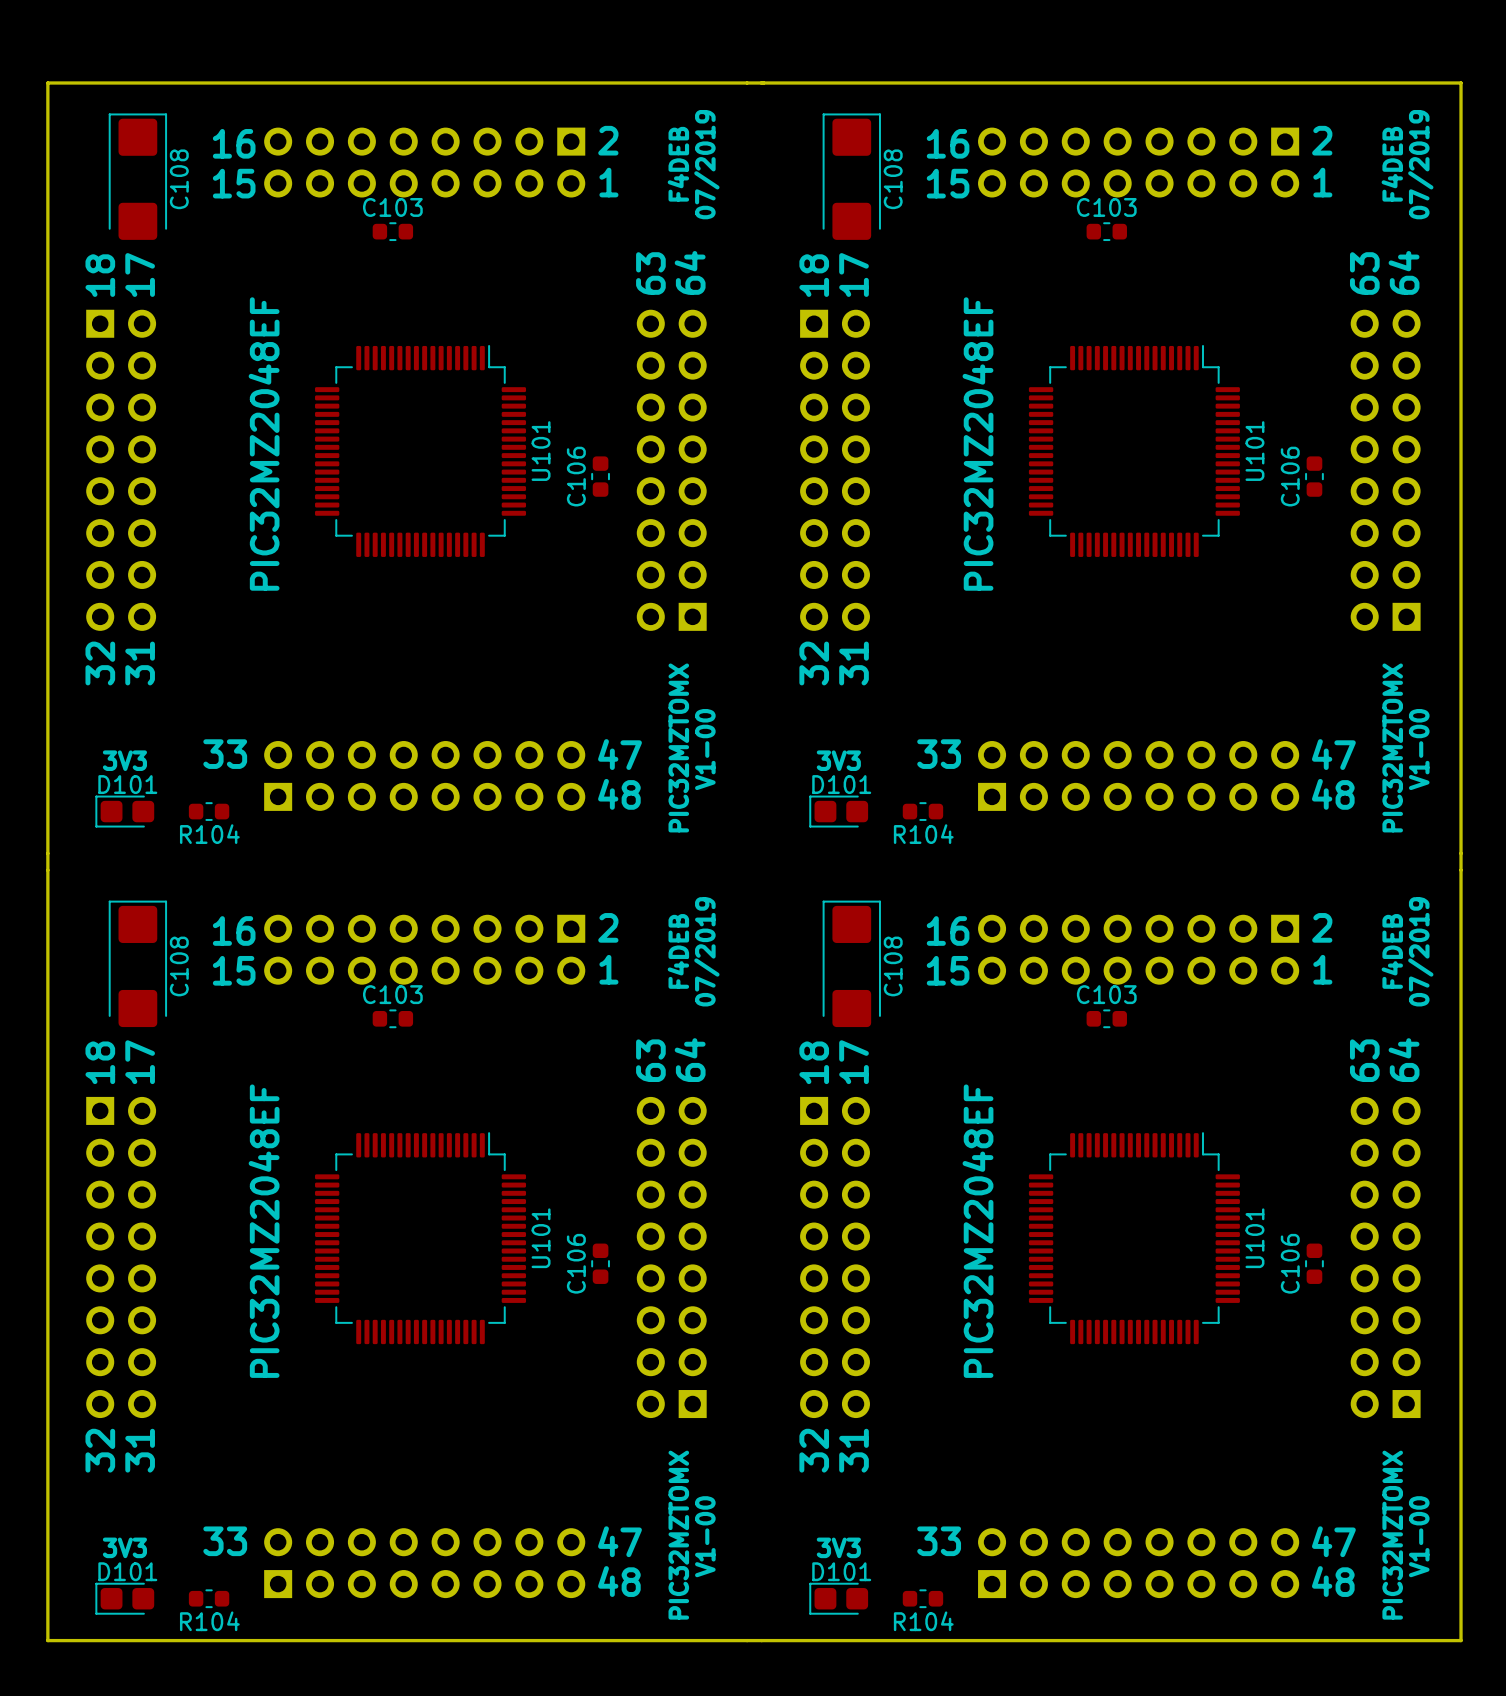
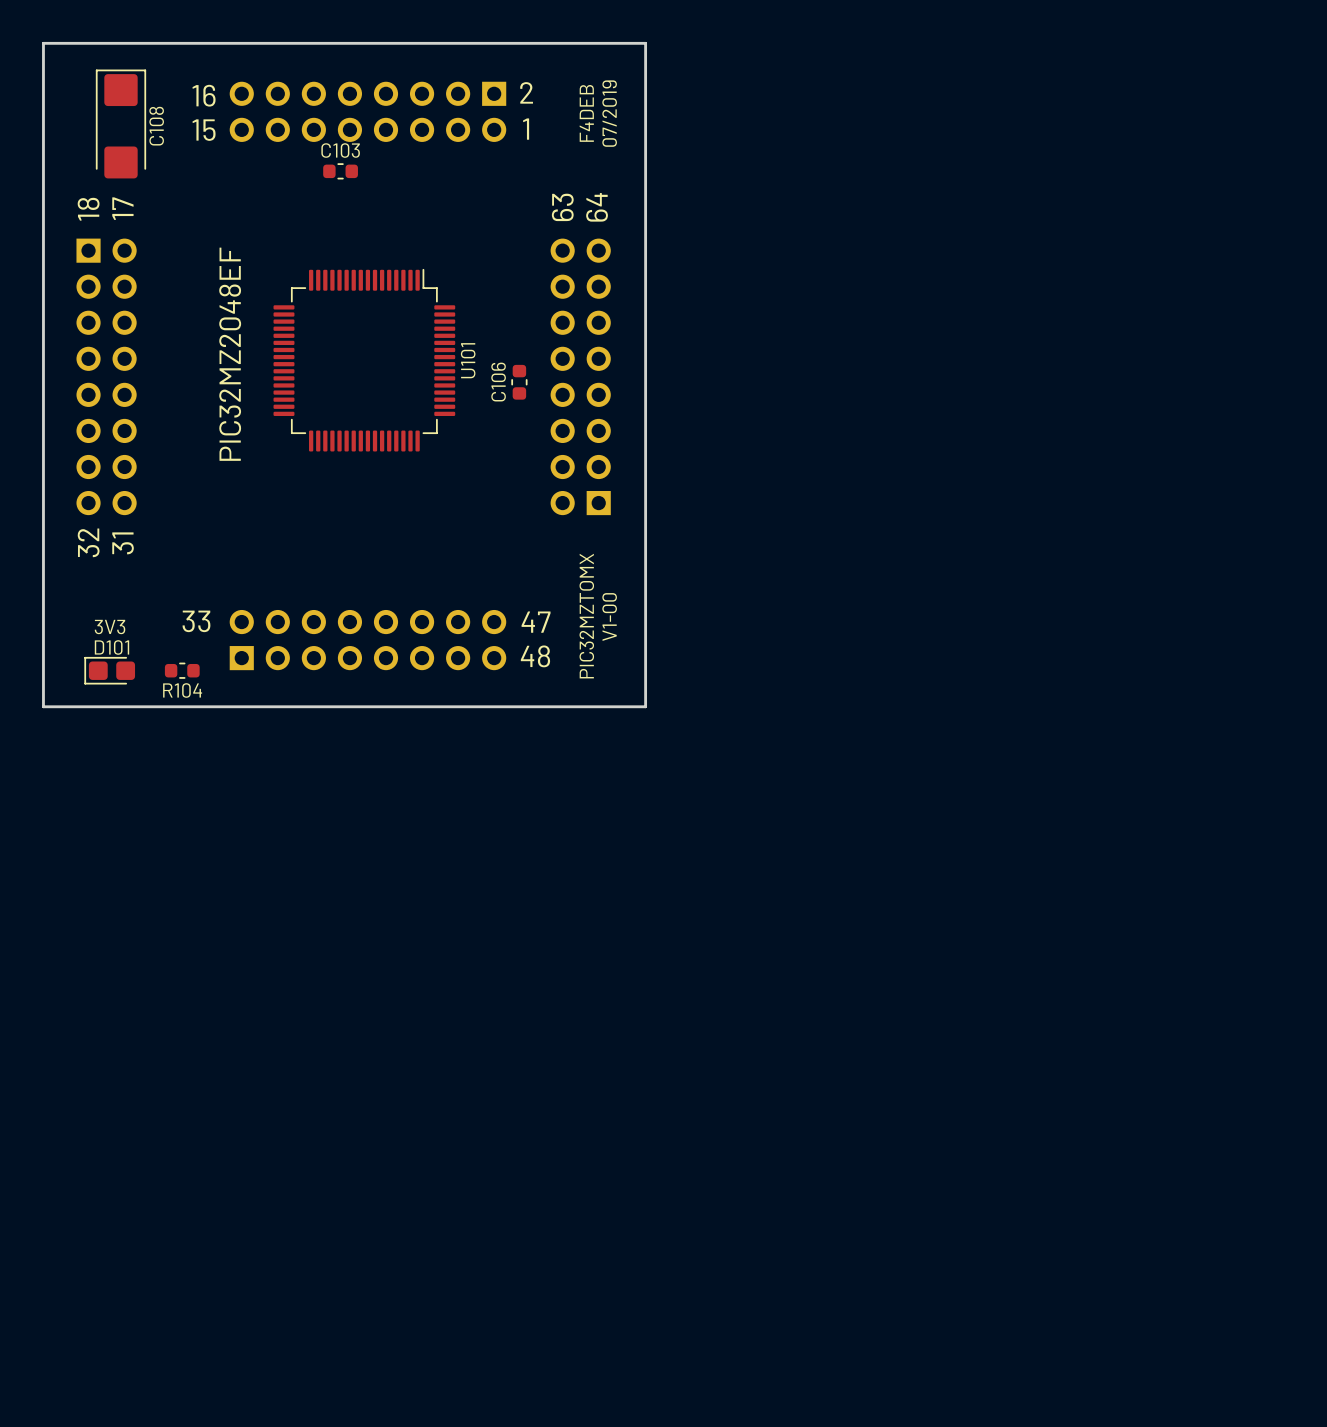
board edge: (747, 82) (1461, 82) (1461, 1640) (47, 1640) (47, 853) -> (645, 43) (645, 706) (43, 706)
text: 2 (1322, 140) -> none
text: 16 (948, 143) -> none
part: (1138, 162) -> none
text: F4DEB (1392, 164) -> none
text: 07/2019 (1420, 164) -> none
C108: (851, 176) -> none
text: 1 (1322, 182) -> none
text: 15 (948, 183) -> none
C103: (1106, 231) -> none
text: 64 (1404, 272) -> none
text: 63 (1364, 273) -> none
text: 18 (814, 275) -> none
text: 17 (854, 275) -> none
text: PIC32MZ2048EF (977, 444) -> none
U101: (1134, 450) -> none
part: (835, 470) -> none
part: (1385, 470) -> none
C106: (1314, 476) -> none
text: 32 (814, 663) -> none
text: 31 (854, 663) -> none
text: PIC32MZTOMX (1392, 747) -> none
text: V1-00 (1419, 749) -> none
text: 33 (939, 754) -> none
text: 47 (1333, 754) -> none
text: 3V3 (838, 760) -> none
part: (1138, 775) -> none
text: 48 (1333, 794) -> none
D101: (838, 811) -> none
R104: (922, 811) -> none
text: 2 (608, 927) -> none
text: 2 (1322, 927) -> none
text: 16 (234, 930) -> none
text: 16 (948, 930) -> none
part: (424, 949) -> none
part: (1138, 949) -> none
text: F4DEB (678, 951) -> none
text: 07/2019 (706, 951) -> none
text: F4DEB (1392, 951) -> none
text: 07/2019 (1420, 951) -> none
C108: (137, 963) -> none
C108: (851, 963) -> none
text: 1 (608, 969) -> none
text: 1 (1322, 969) -> none
text: 15 (234, 970) -> none
text: 15 (948, 970) -> none
C103: (392, 1018) -> none
C103: (1106, 1018) -> none
text: 63 (650, 1060) -> none
text: 64 (690, 1060) -> none
text: 63 (1364, 1060) -> none
text: 64 (1404, 1060) -> none
text: 18 (100, 1062) -> none
text: 17 (140, 1062) -> none
text: 18 (814, 1062) -> none
text: 17 (854, 1062) -> none
text: PIC32MZ2048EF (264, 1231) -> none
text: PIC32MZ2048EF (977, 1231) -> none
U101: (420, 1238) -> none
U101: (1134, 1238) -> none
part: (121, 1257) -> none
part: (671, 1257) -> none
part: (835, 1257) -> none
part: (1385, 1257) -> none
C106: (600, 1263) -> none
C106: (1314, 1263) -> none
text: 32 (100, 1450) -> none
text: 31 (140, 1450) -> none
text: 32 (814, 1450) -> none
text: 31 (854, 1450) -> none
text: PIC32MZTOMX (678, 1535) -> none
text: PIC32MZTOMX (1392, 1535) -> none
text: V1-00 (705, 1536) -> none
text: V1-00 (1419, 1536) -> none
text: 33 (225, 1541) -> none
text: 47 (619, 1541) -> none
text: 33 (939, 1541) -> none
text: 47 (1333, 1541) -> none
text: 3V3 (124, 1547) -> none
text: 3V3 (838, 1547) -> none
part: (424, 1563) -> none
part: (1138, 1563) -> none
text: 48 (619, 1581) -> none
text: 48 (1333, 1581) -> none
D101: (124, 1598) -> none
R104: (209, 1598) -> none
D101: (838, 1598) -> none
R104: (922, 1598) -> none

